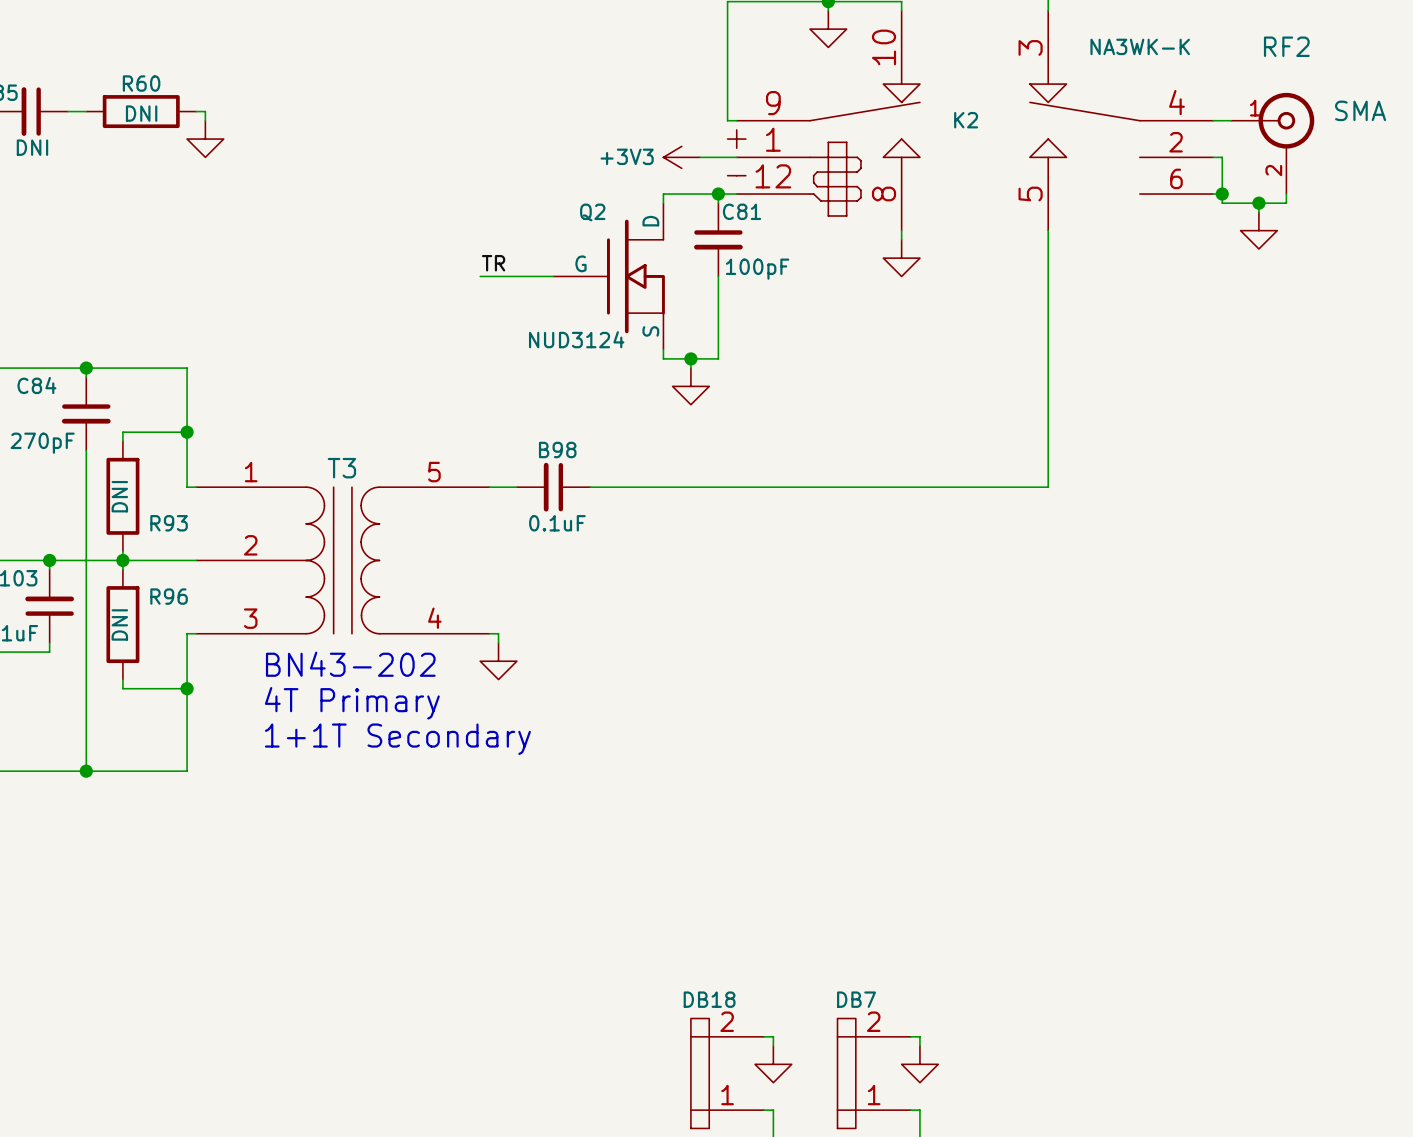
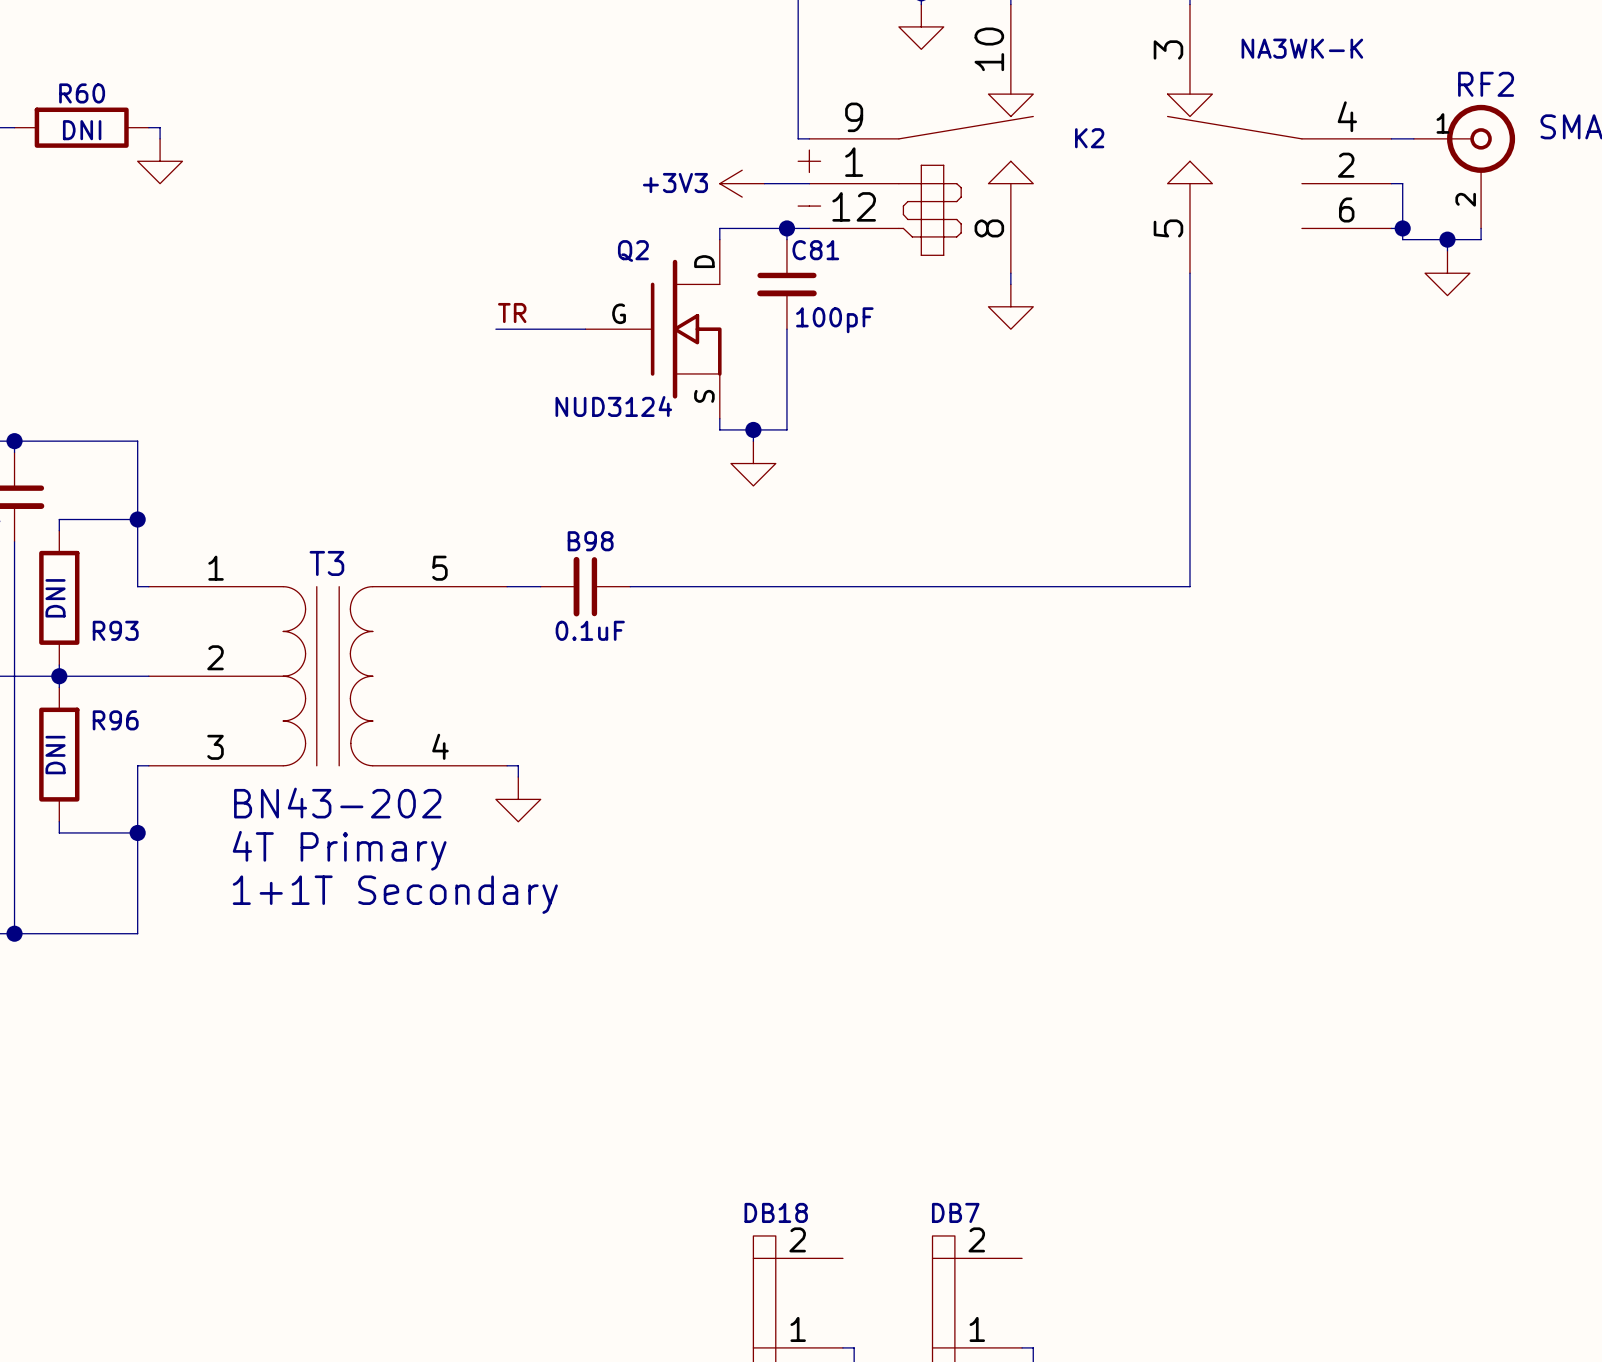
RF2 name position: RF2 (1286, 46) -> RF2 (1486, 84)
wire: (764, 1036) (773, 1036) (773, 1046) -> none
wire: (910, 1036) (919, 1036) (919, 1046) -> none
power symbol: (773, 1064) -> none
power symbol: (919, 1064) -> none

